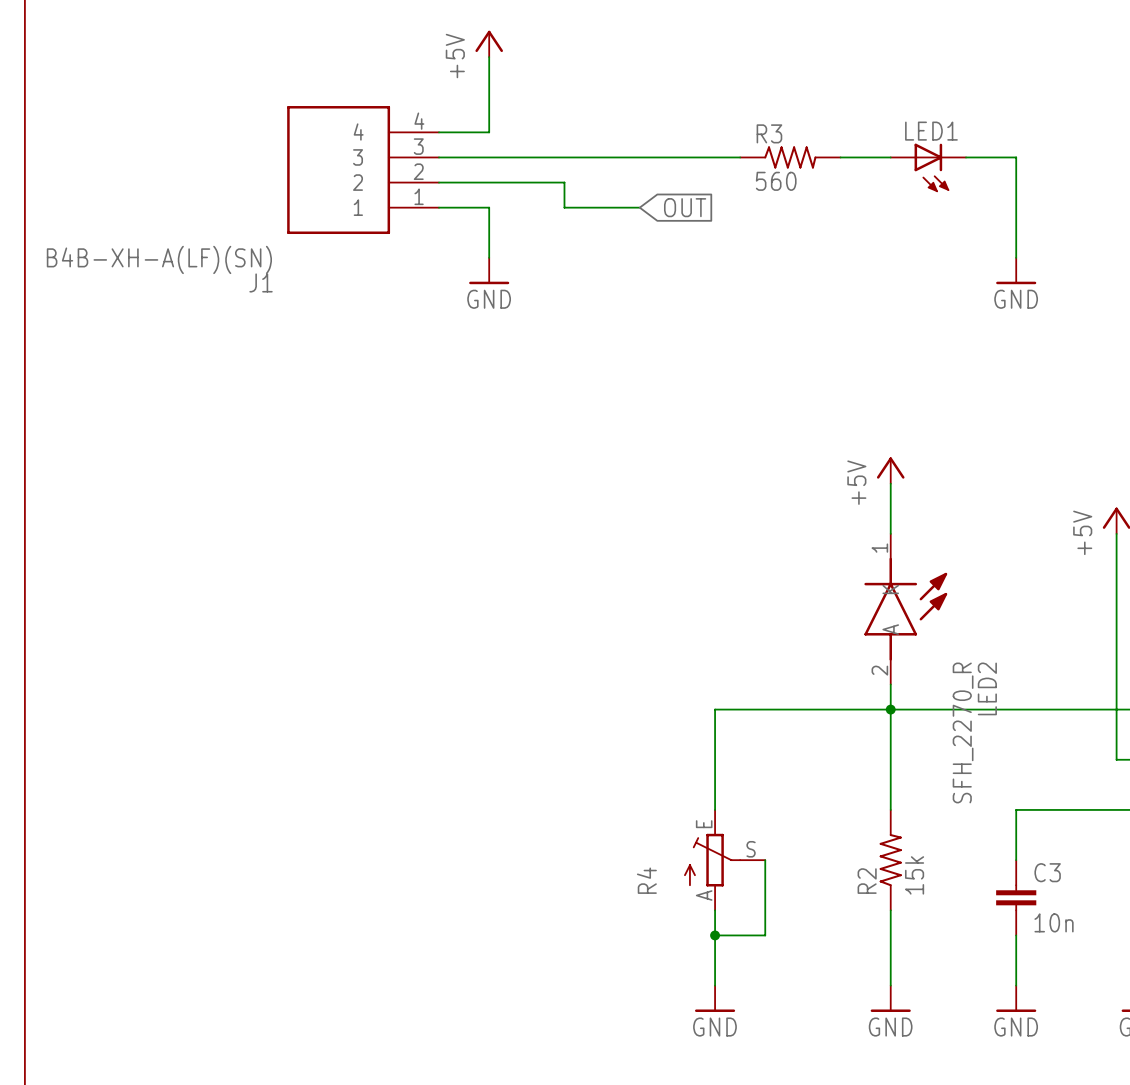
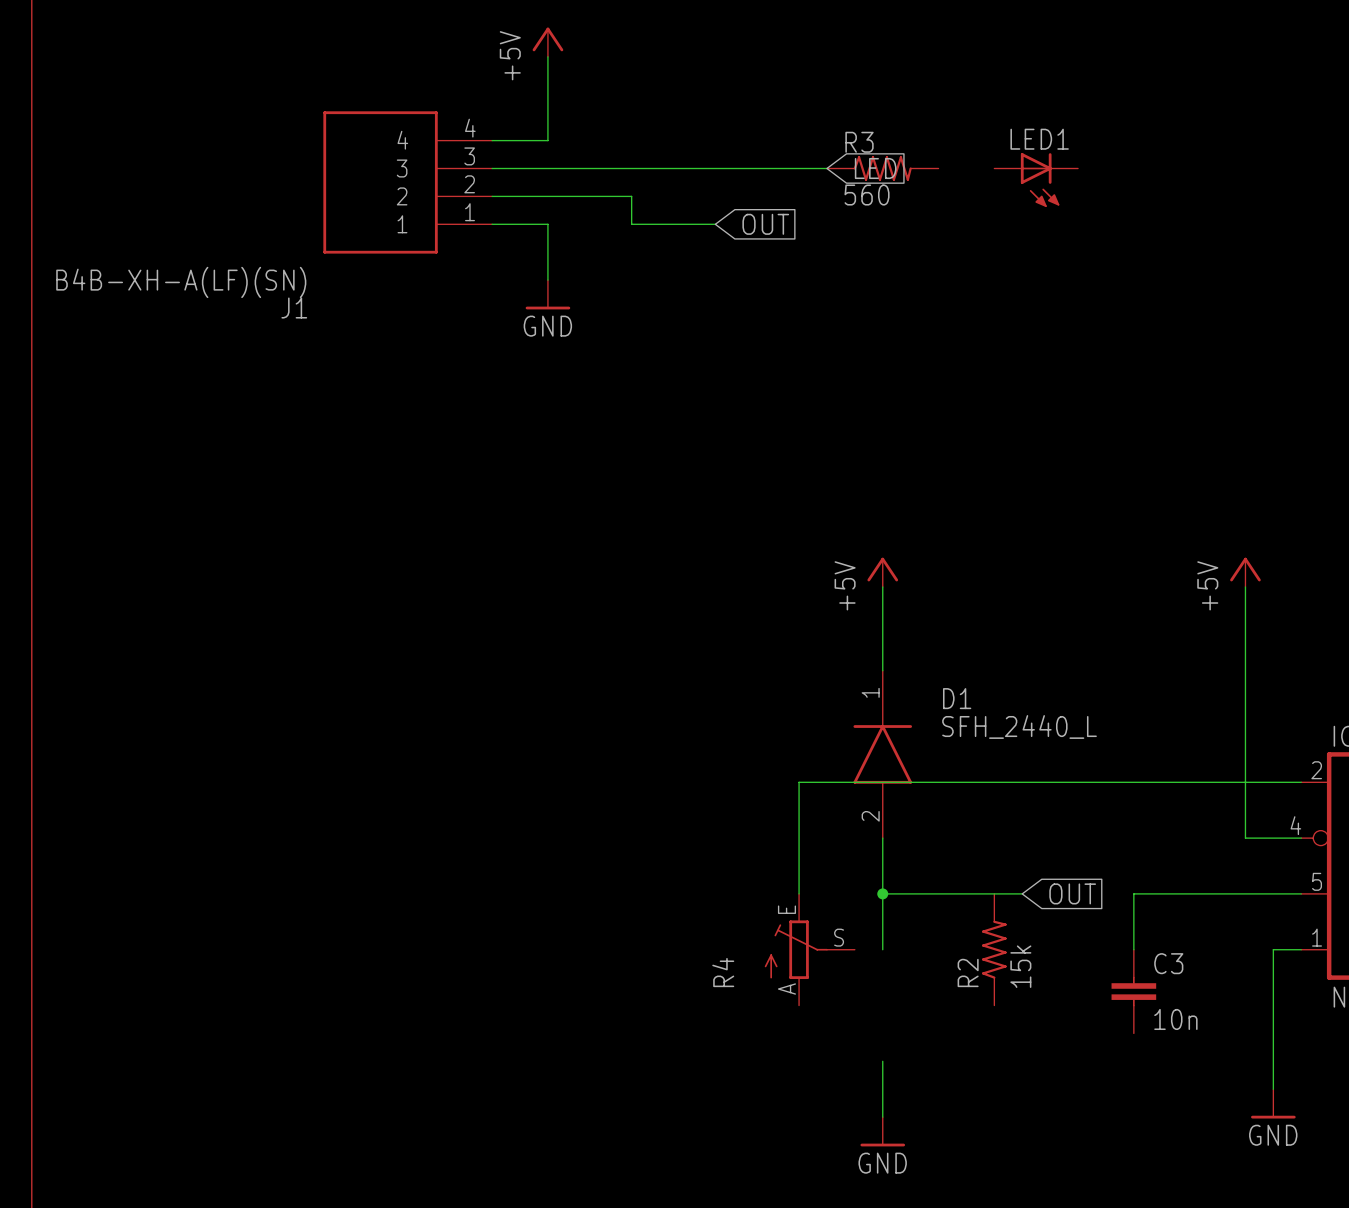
global label: none -> LED (875, 168)
wire: (840, 157) (890, 157) -> none
wire: (966, 157) (1016, 157) (1016, 257) -> none
power symbol: GND (1016, 271) -> none
power symbol position: +5V (890, 470) -> +5V (882, 572)
wire: (890, 483) (890, 533) -> none
wire: none -> (882, 587) (882, 670)
LED2: SFH_2270_R (905, 609) -> none
D1: none -> SFH_2440_L (882, 754)
wire: (890, 684) (890, 809) -> none
junction: (890, 709) -> none
wire: none -> (882, 838) (882, 949)
wire: none -> (882, 893) (1022, 893)
junction: none -> (882, 893)
global label: none -> OUT (1072, 893)
wire: (765, 860) (765, 935) (715, 935) -> none
wire: (715, 910) (715, 985) -> none
wire: (890, 910) (890, 985) -> none
junction: (715, 935) -> none
wire: (1016, 935) (1016, 985) -> (882, 1061) (882, 1117)
power symbol: GND (715, 998) -> none
power symbol: GND (890, 998) -> none
power symbol: GND (1016, 998) -> none
power symbol: none -> GND (882, 1131)

